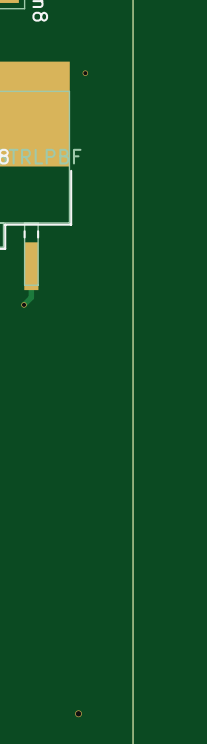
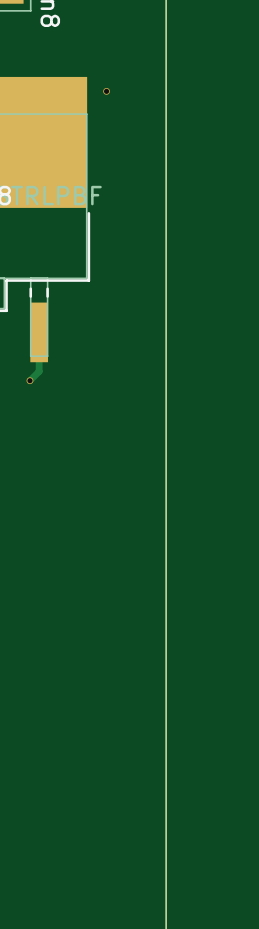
via: (78, 713) -> none

